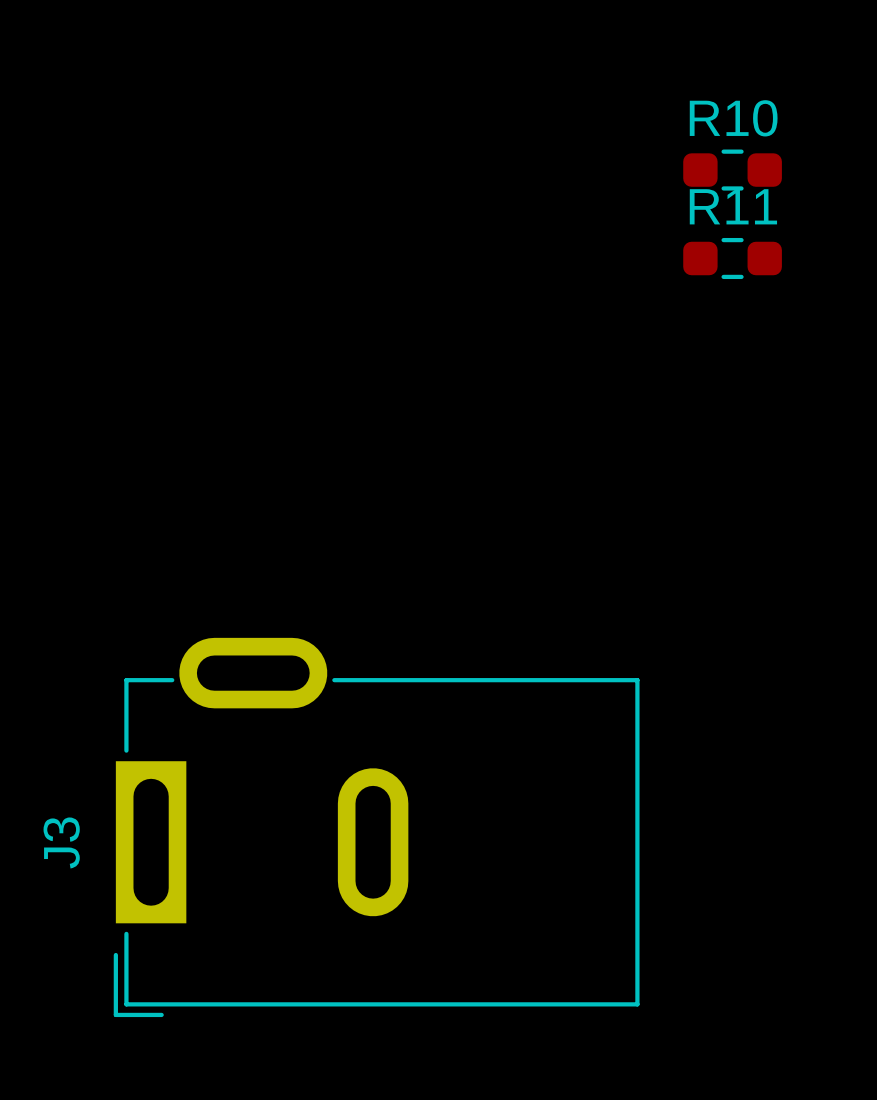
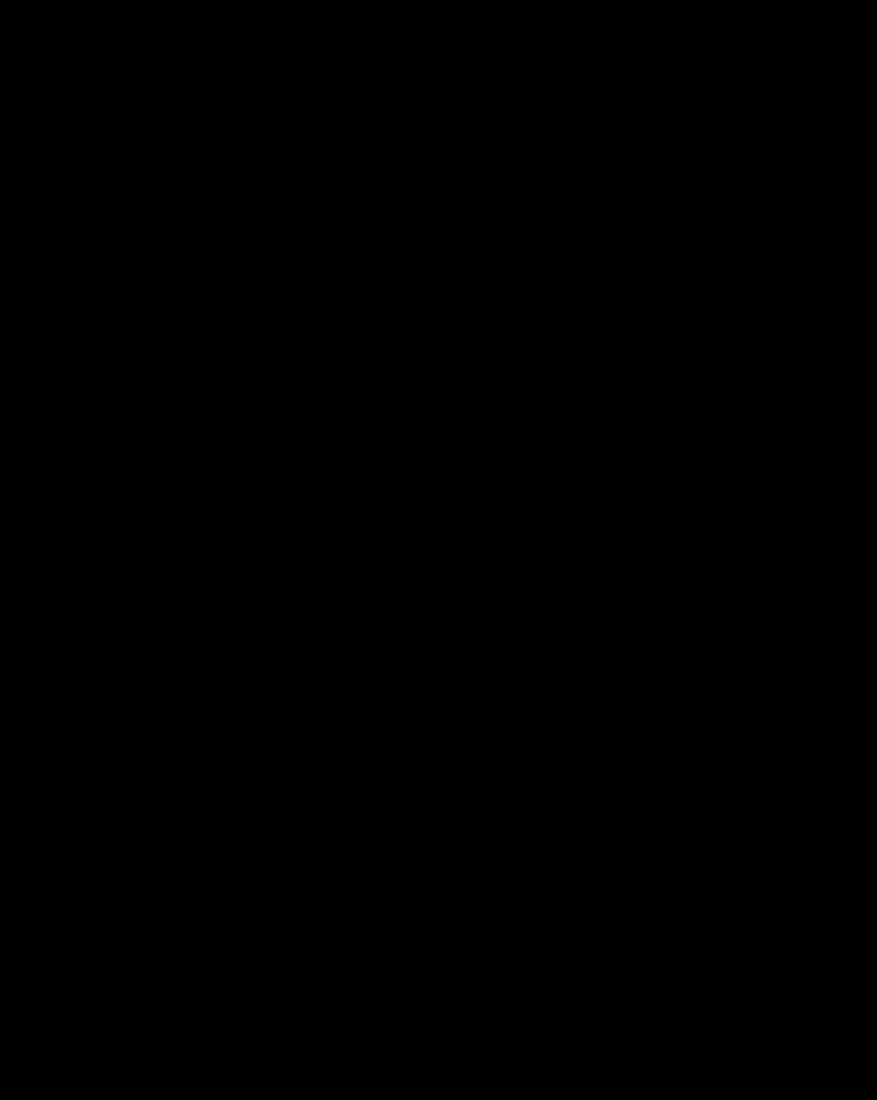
R10: (732, 170) -> none
R11: (732, 258) -> none
J3: (376, 827) -> none

